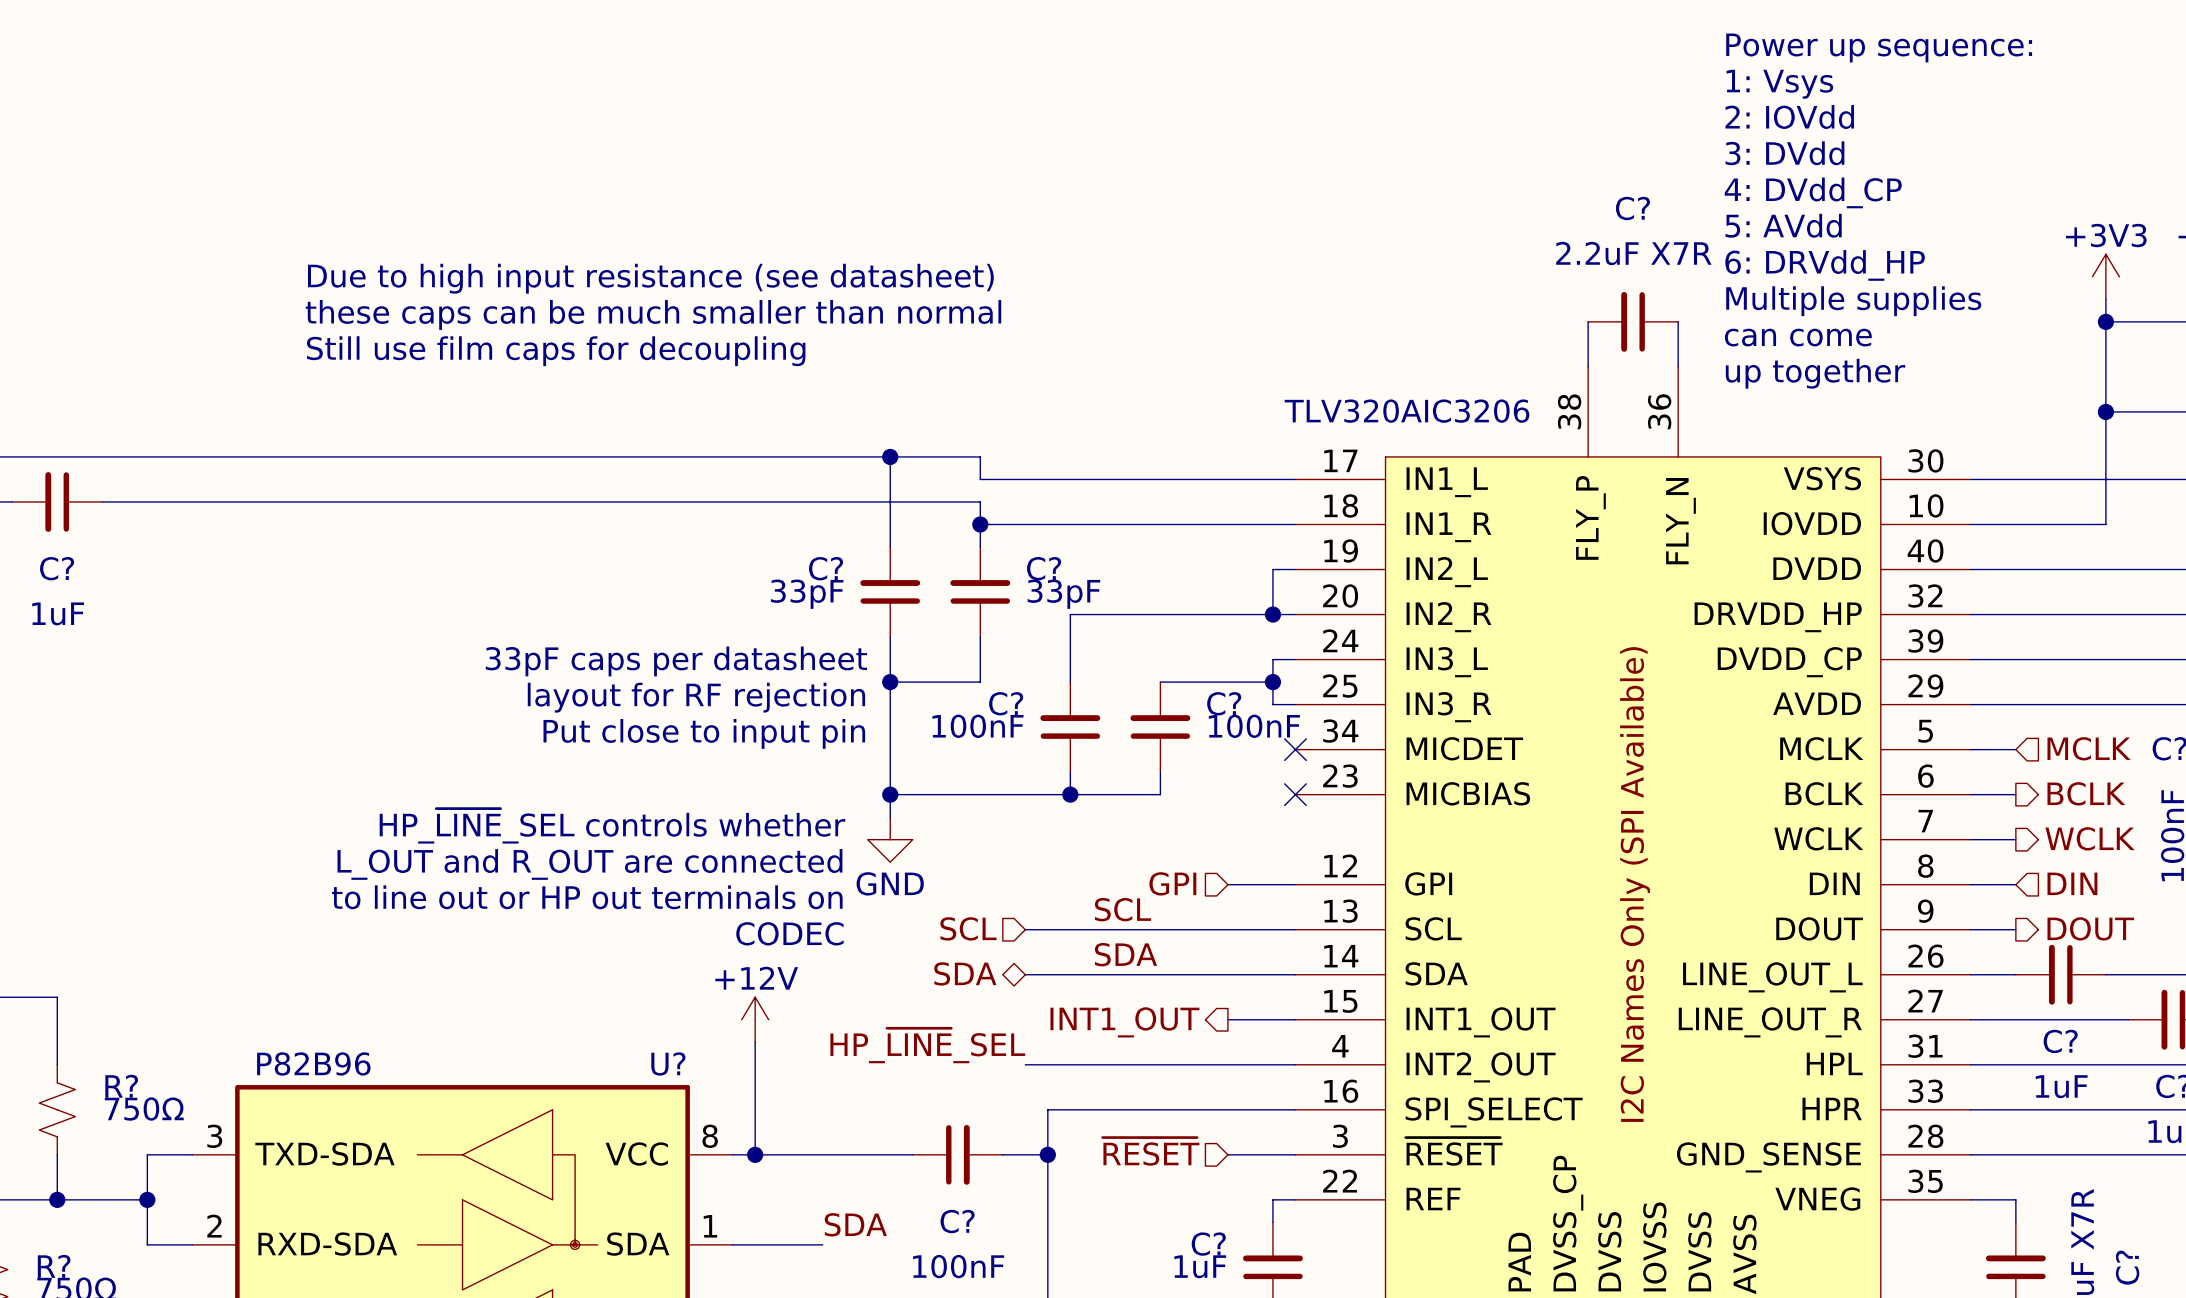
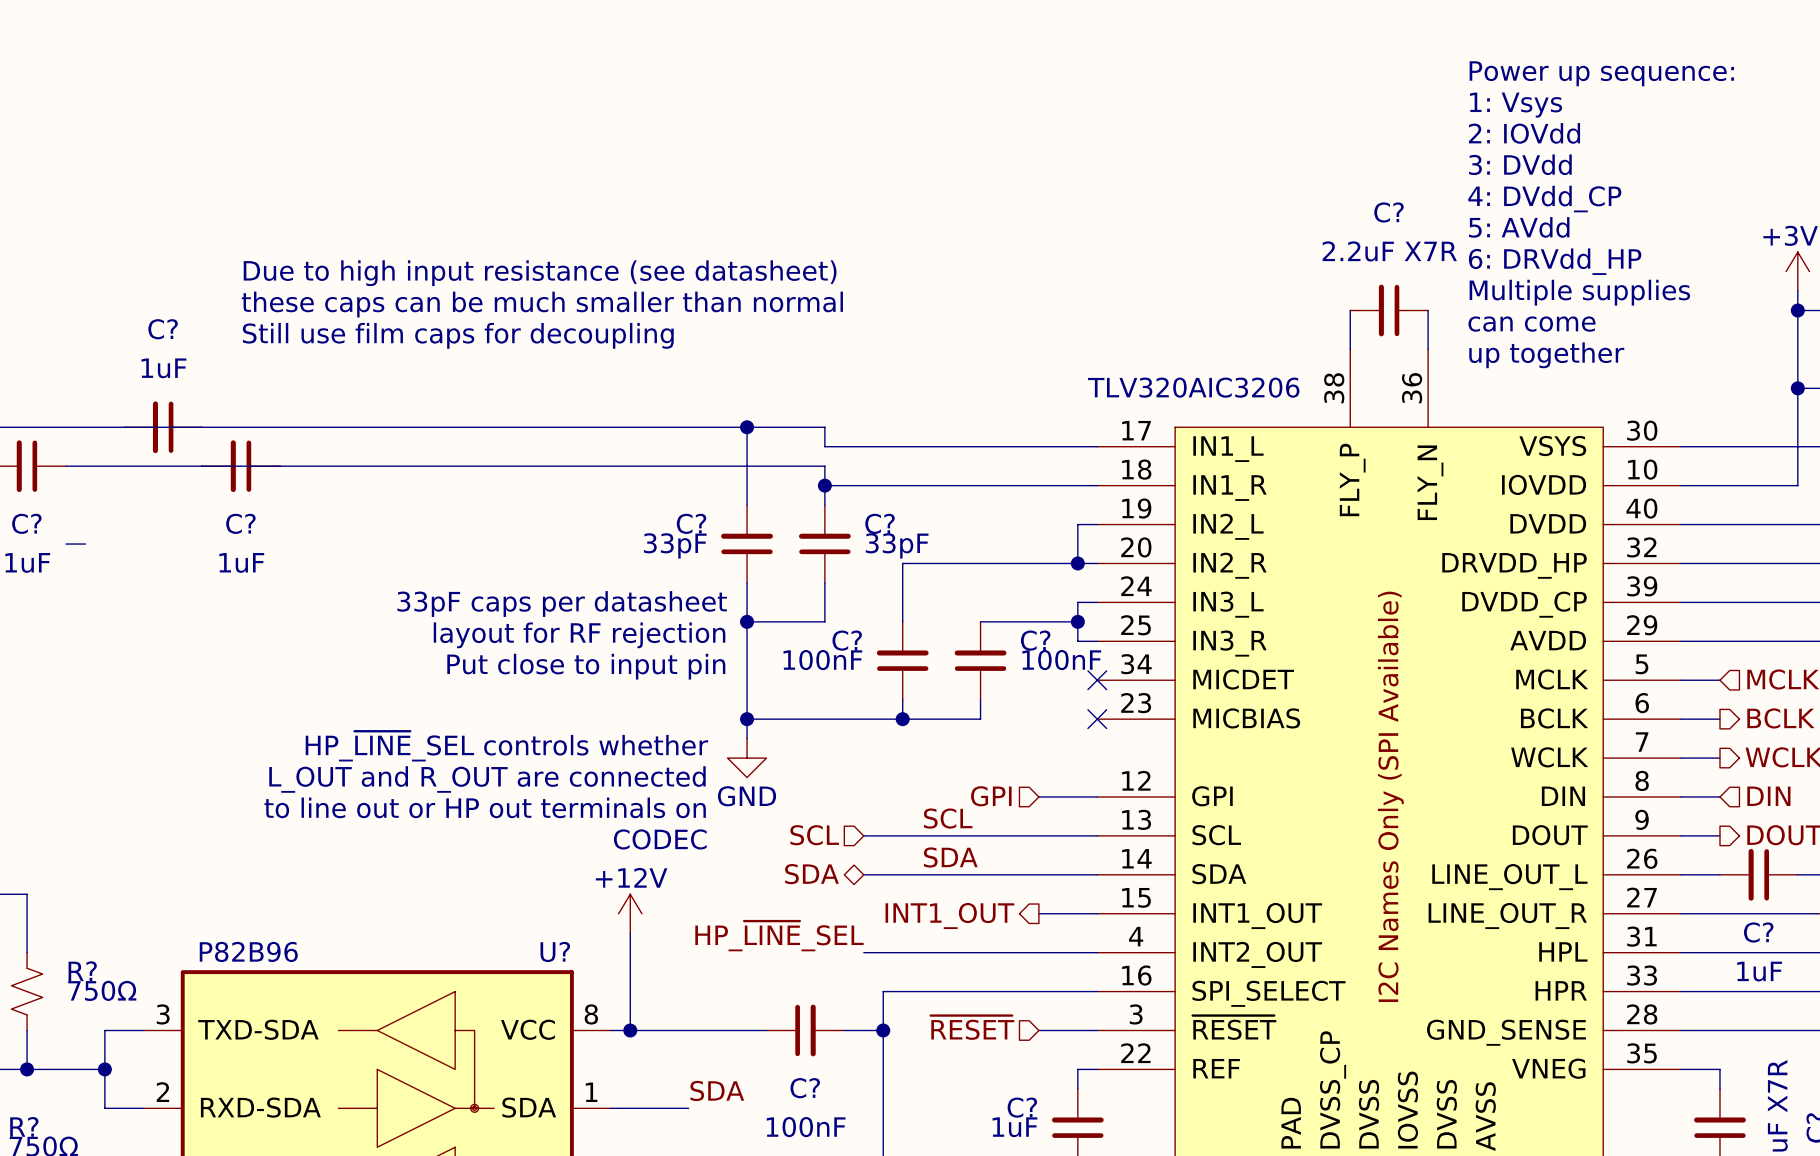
C?: none -> 1uF (163, 427)
C?: none -> 1uF (241, 466)
wire: none -> (65, 544) (85, 544)

